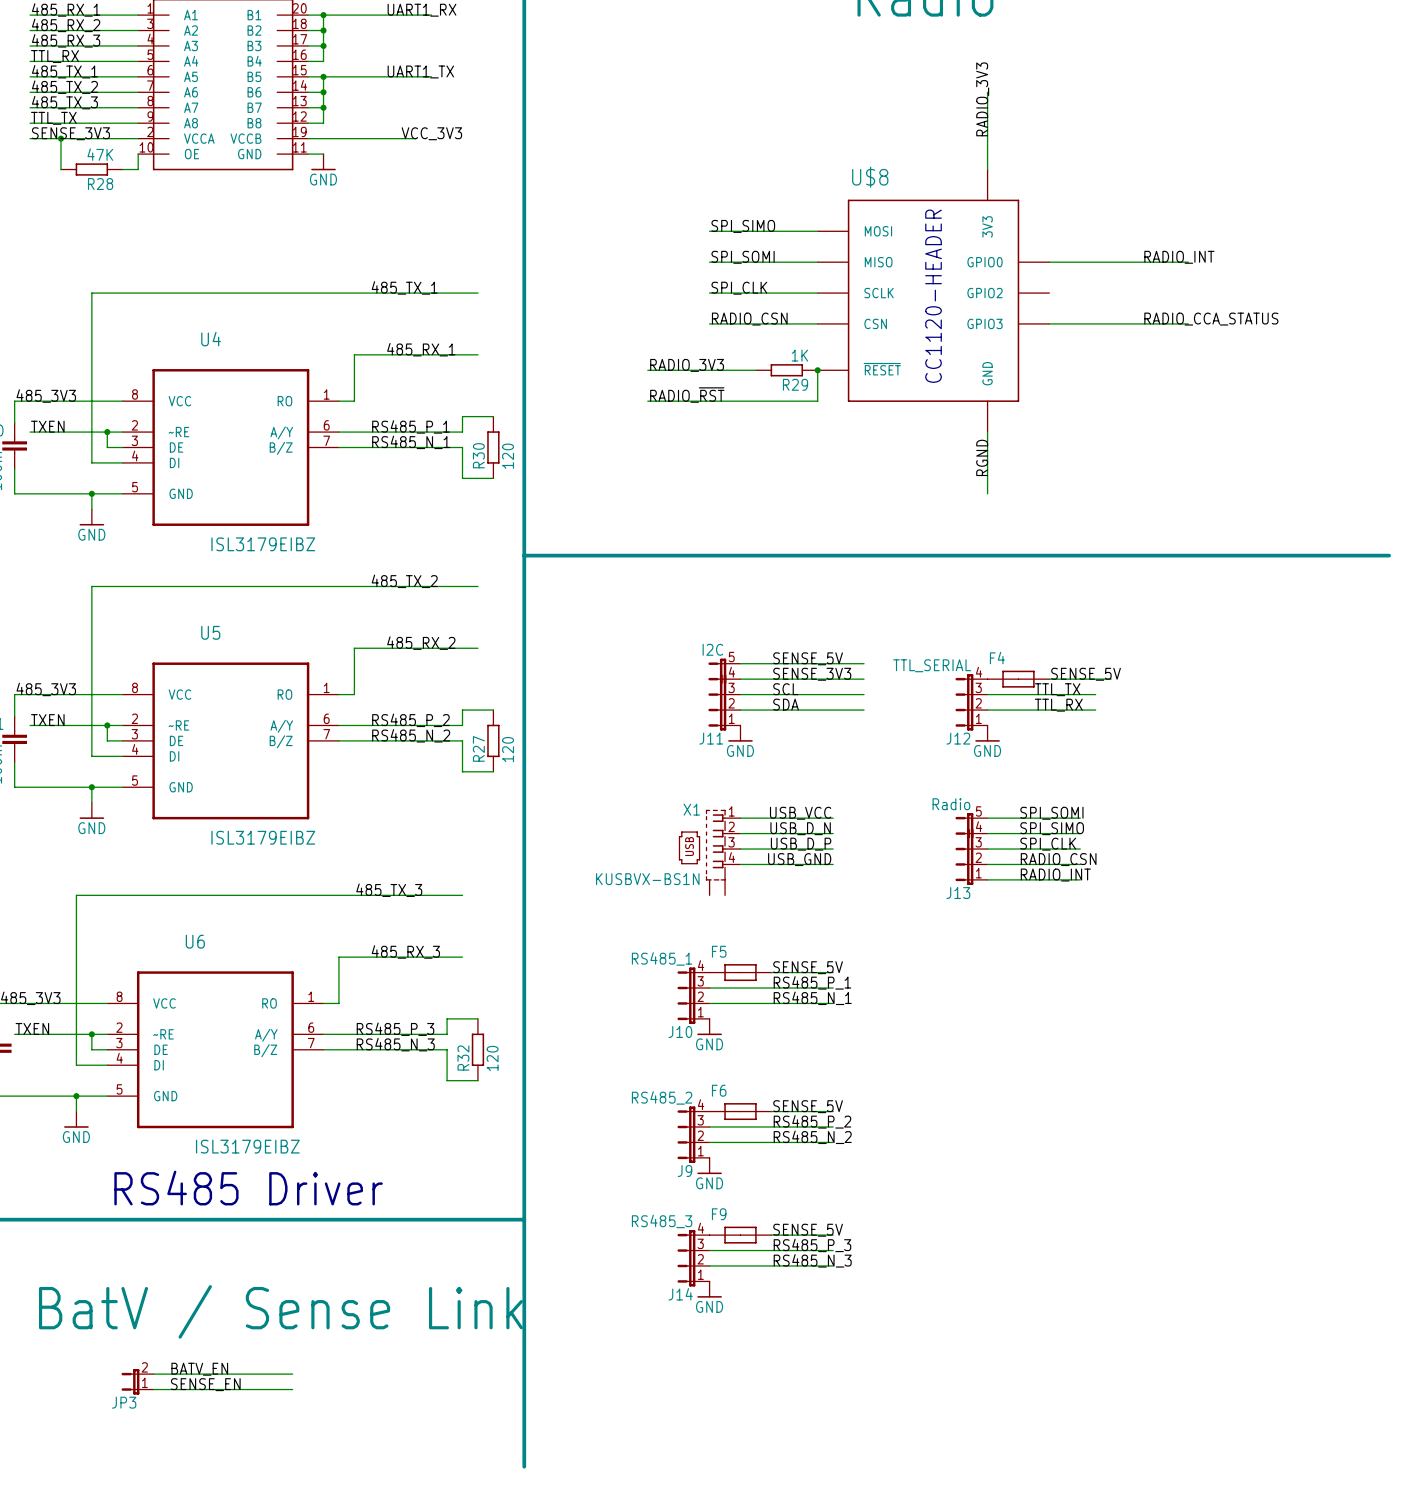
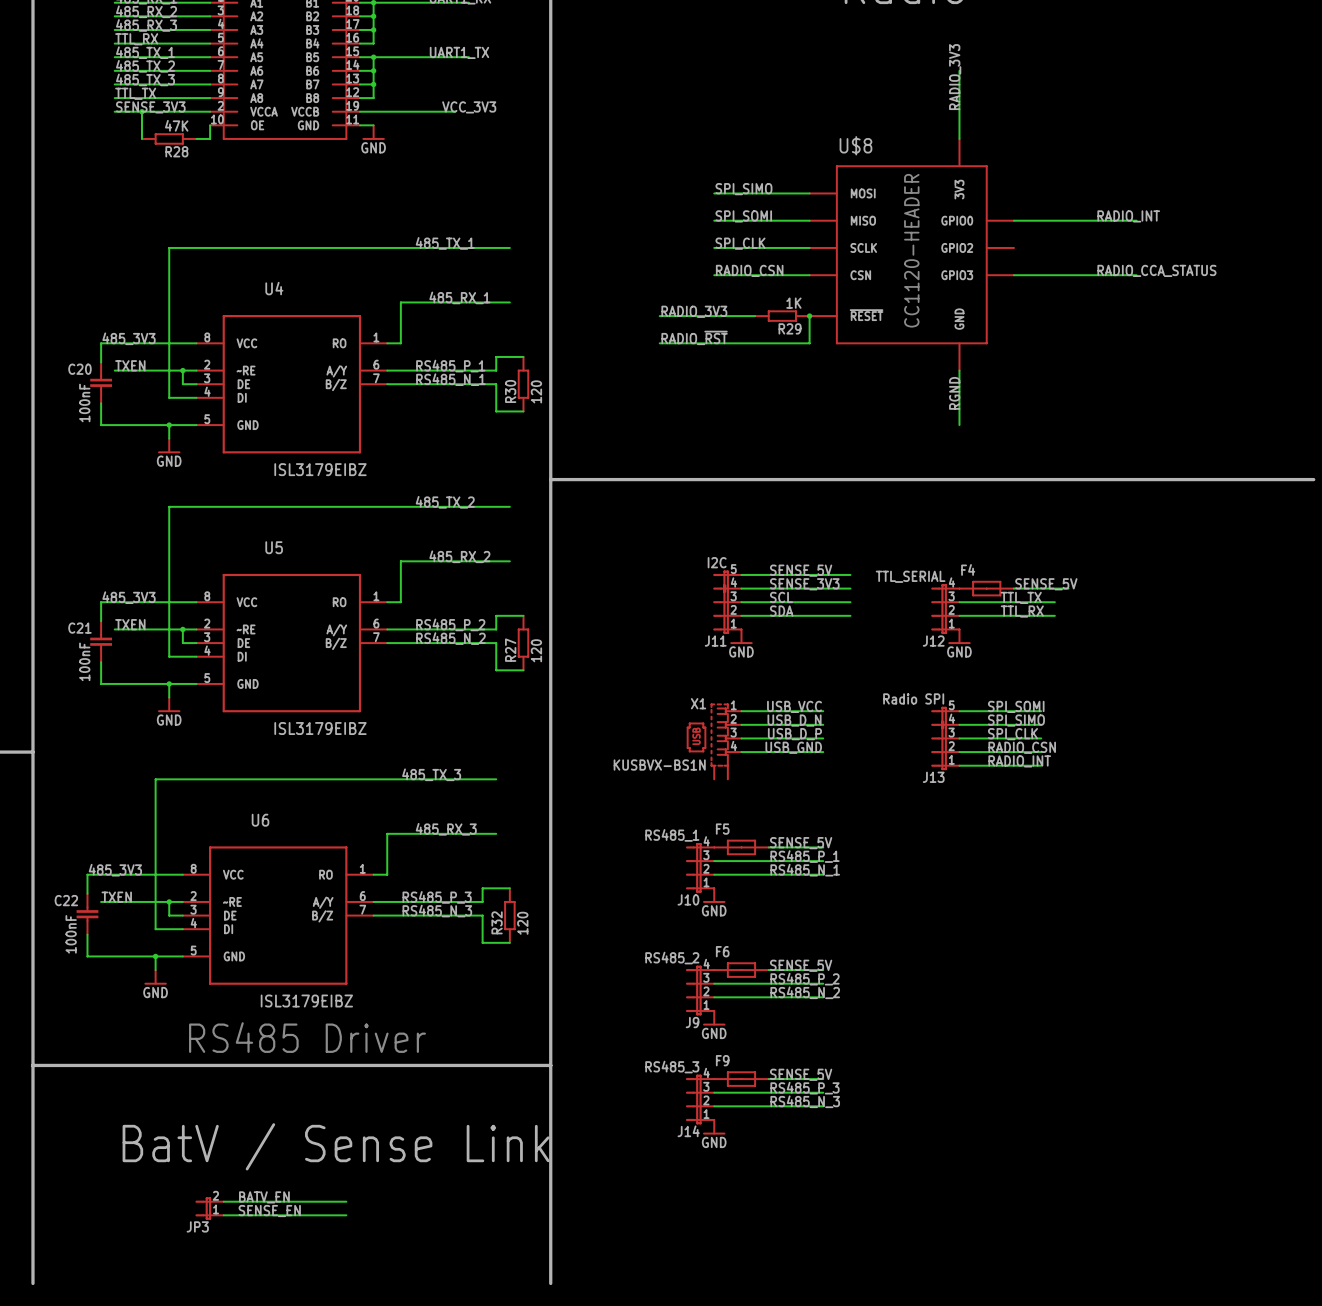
J13 value: Radio (951, 804) -> Radio SPI (913, 698)

